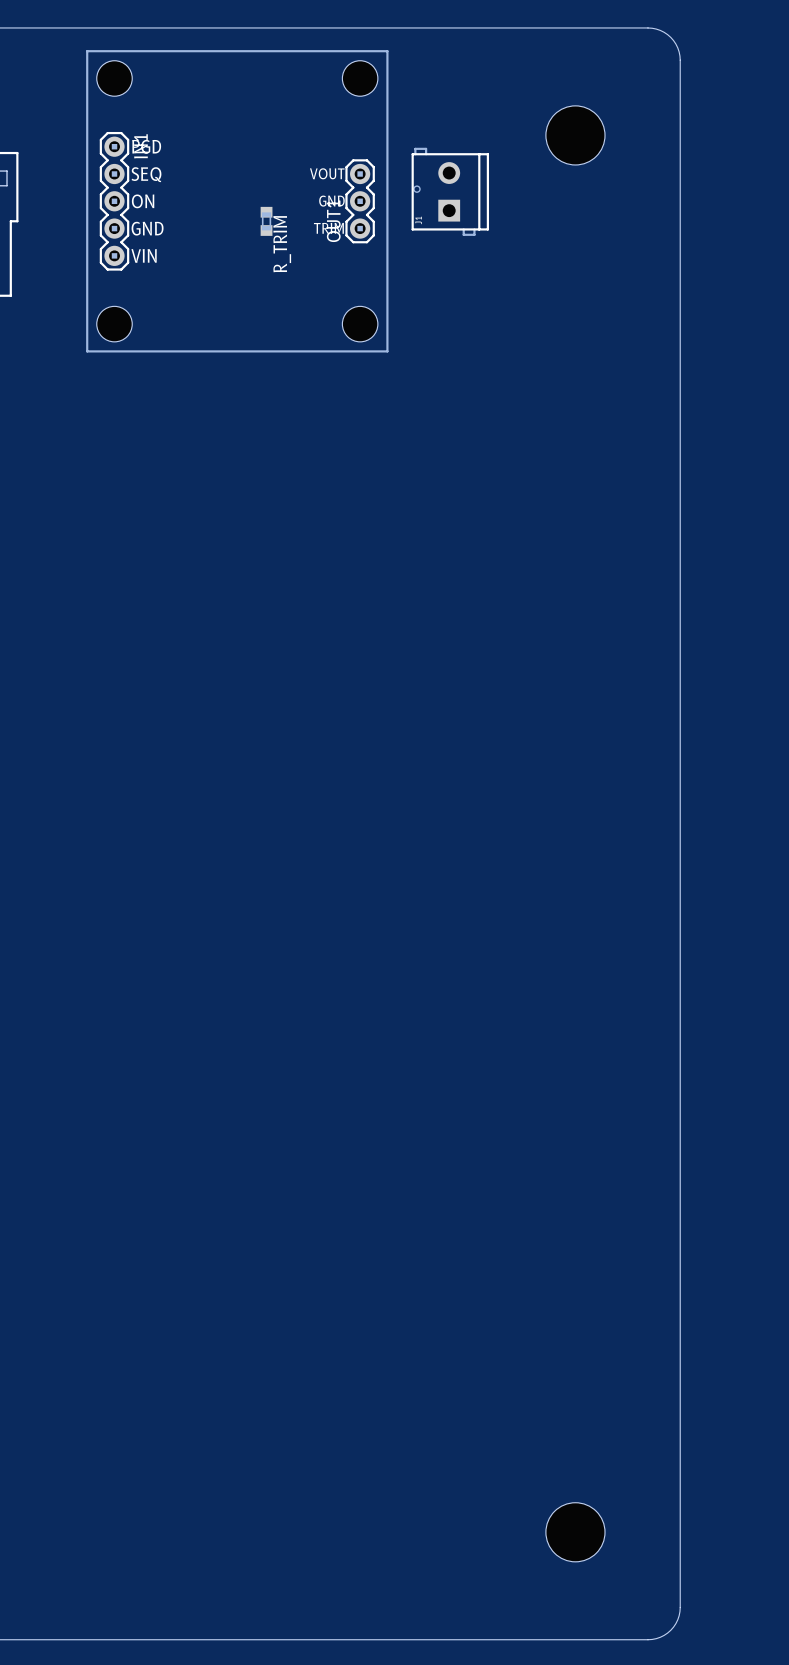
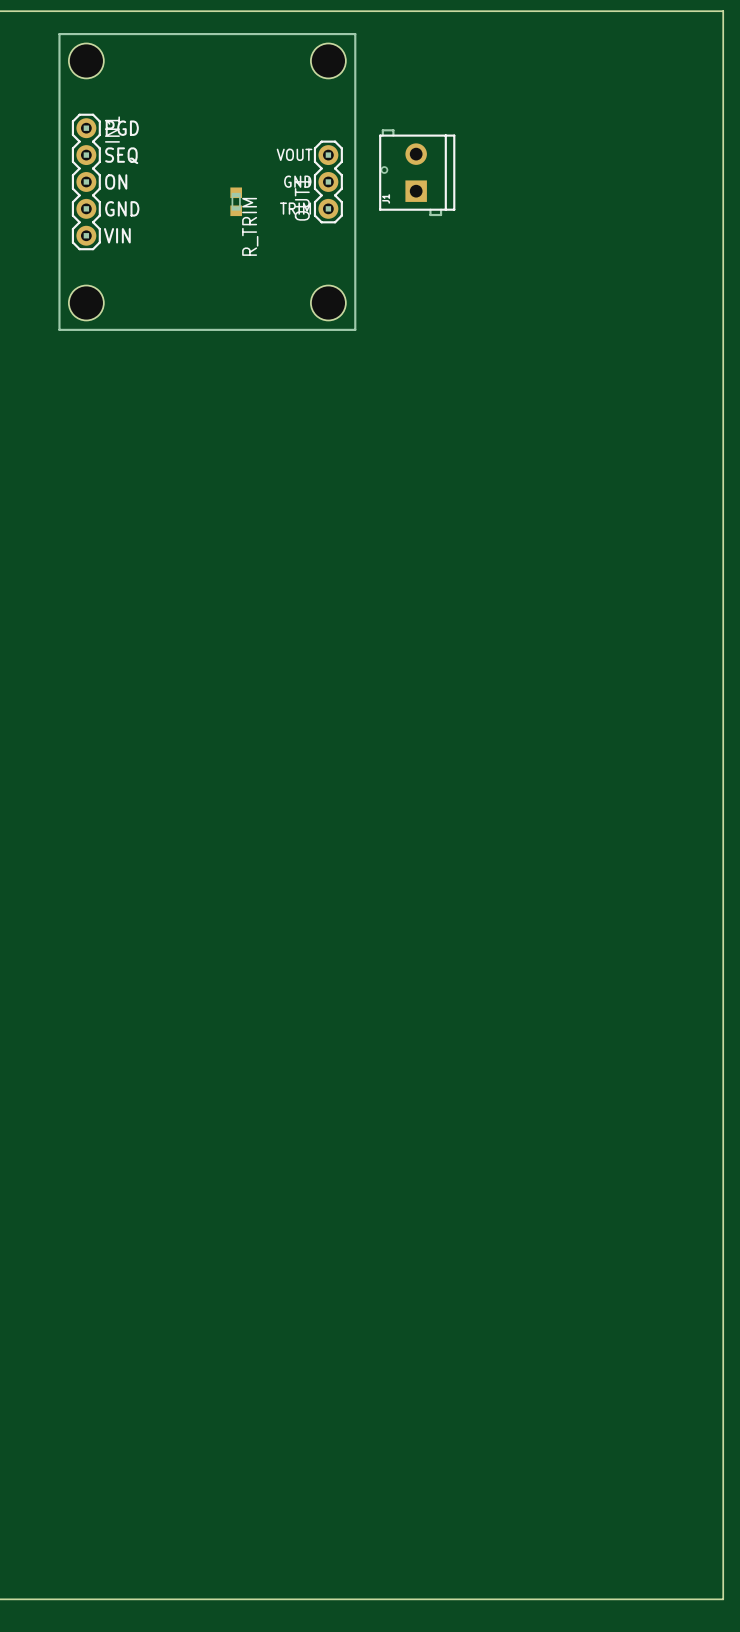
board edge: (647, 27) (660, 30) (670, 37) (677, 47) (680, 60) (680, 1607) (677, 1619) (670, 1630) (660, 1637) (647, 1639) -> (612, 11) (723, 11) (723, 1599) (612, 1599)
hole: (575, 135) -> none
hole: (575, 1532) -> none

